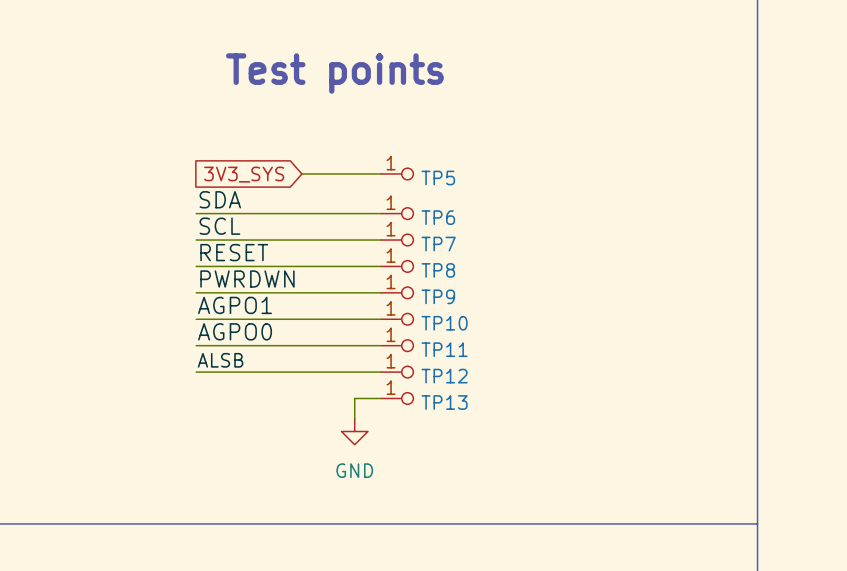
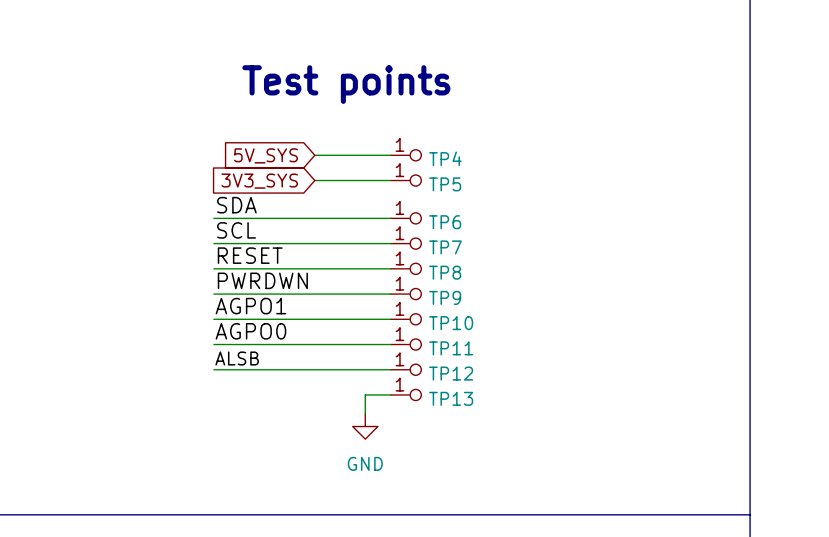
wire: none -> (314, 155) (390, 155)
TP4: none -> (405, 155)
global label: none -> 5V_SYS (266, 155)

